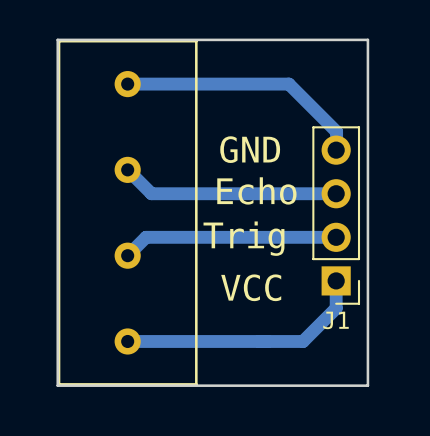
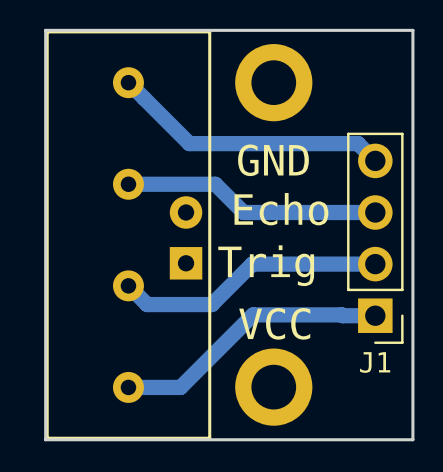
track: (127, 84) (288, 84) (336, 131) (336, 150) -> (128, 82) (189, 143) (358, 143) (375, 160)
part: none -> (273, 82)
track: (224, 193) (151, 193) (127, 169) (152, 194) (336, 194) -> (243, 212) (215, 184) (128, 184)
part: none -> (186, 237)
track: (232, 237) (146, 237) (127, 255) (145, 237) (336, 237) -> (252, 264) (211, 304) (147, 304) (128, 285)
track: (336, 280) (336, 308) (303, 341) (171, 341) -> (375, 315) (253, 314) (180, 387)
part: none -> (273, 387)

